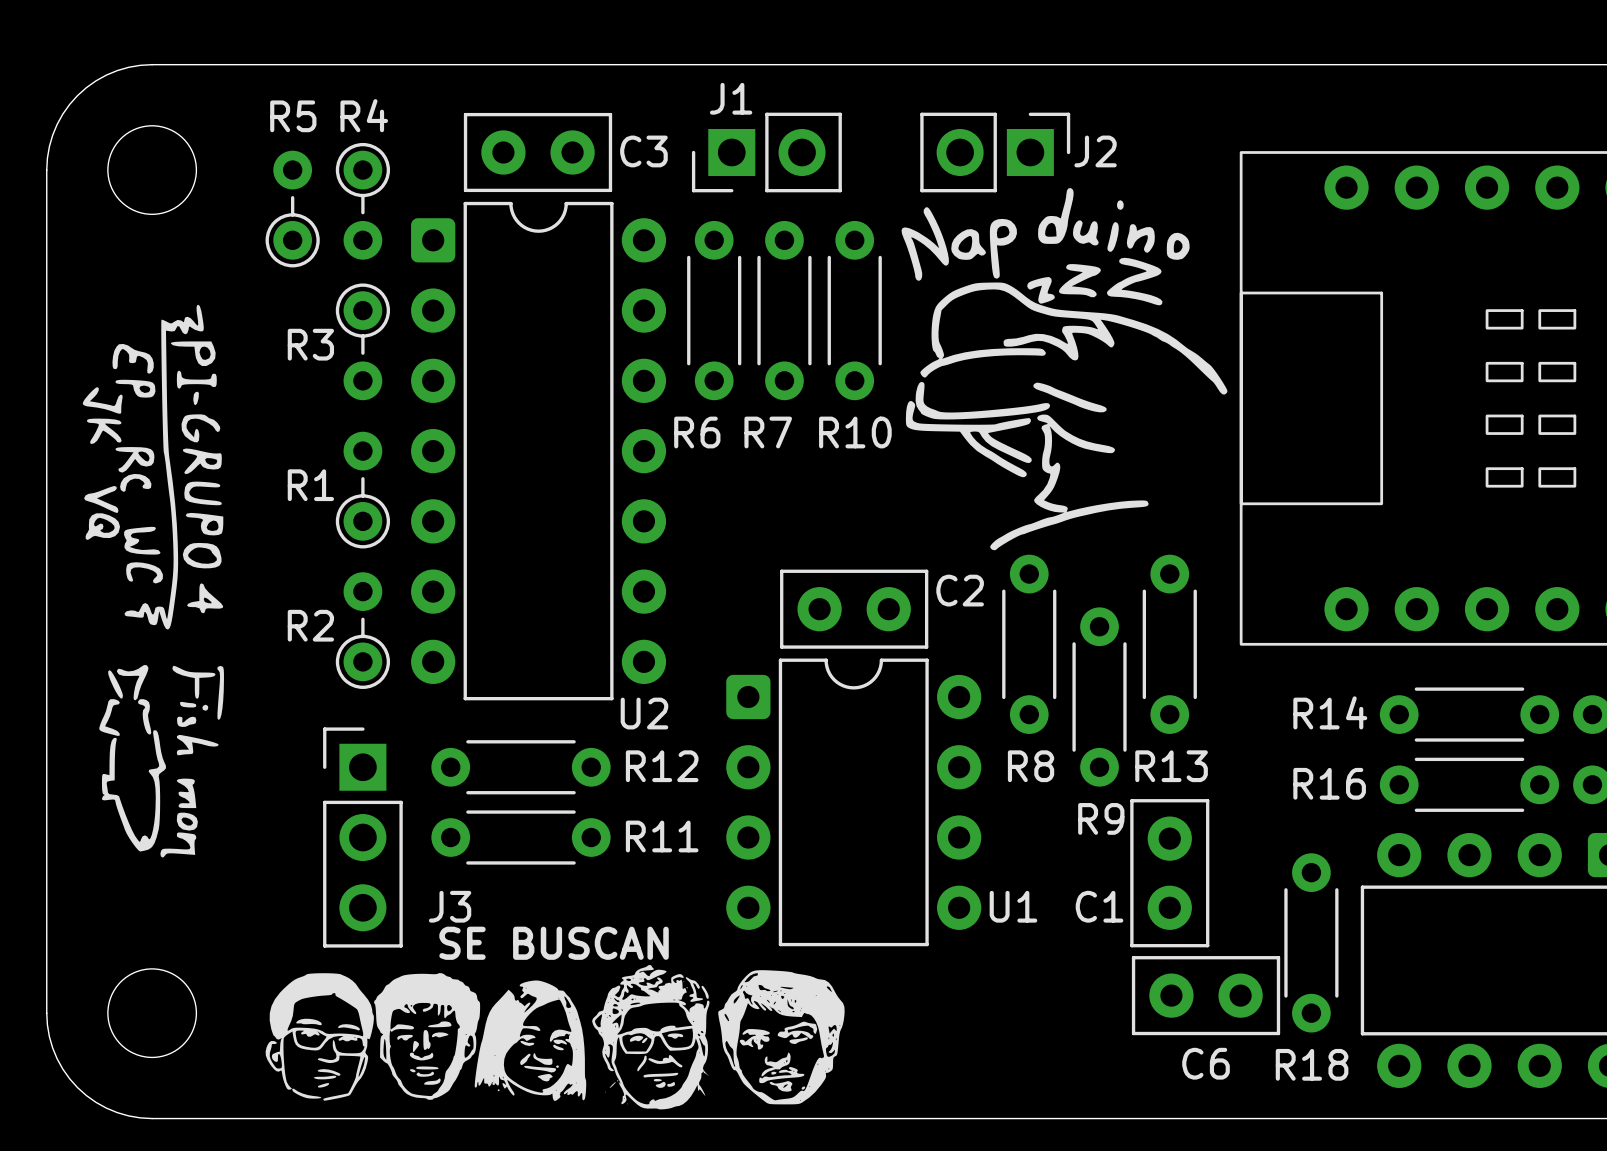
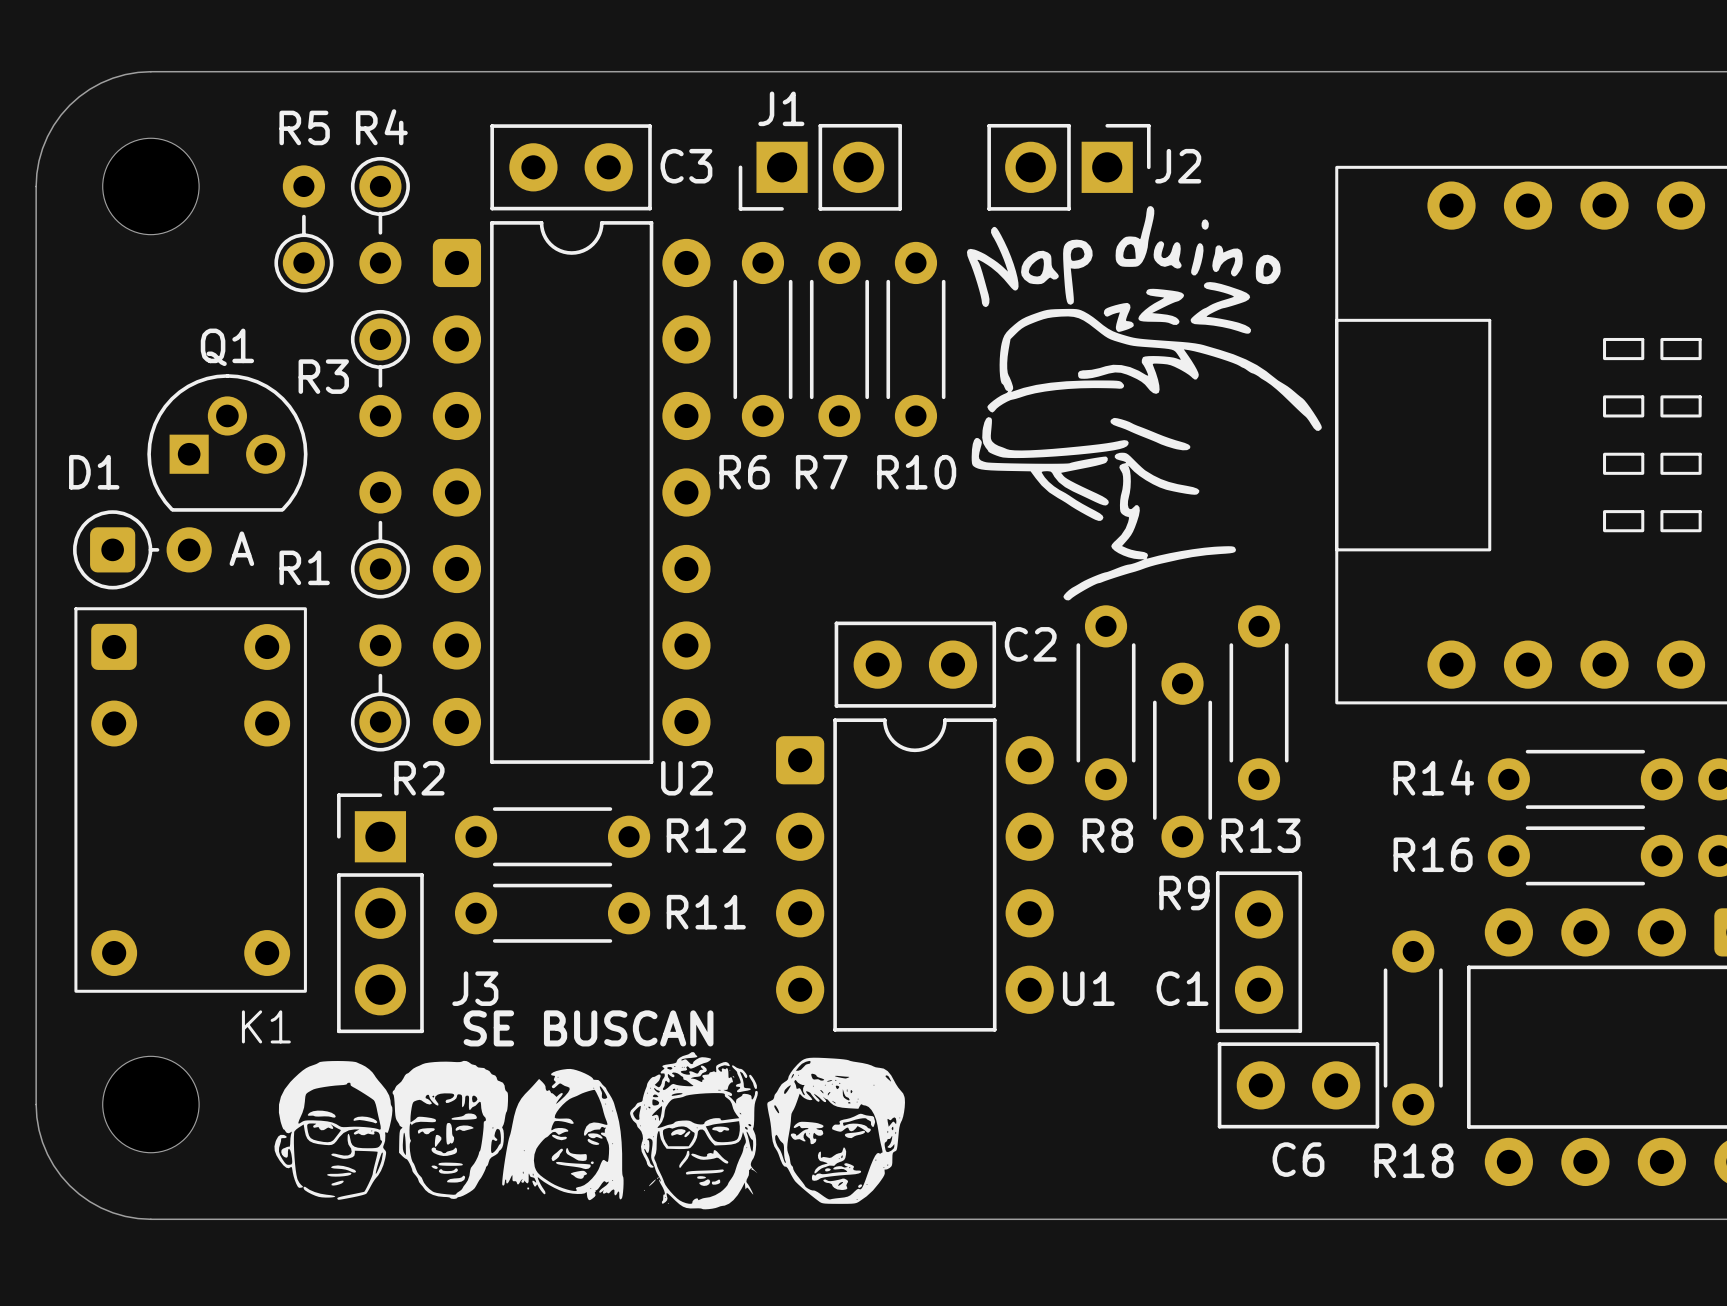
drawing: [82, 304, 224, 858] -> none
Q1: none -> (227, 442)
R1 name position: R1 (310, 485) -> R1 (304, 567)
D1: none -> (142, 549)
R2 name position: R2 (310, 625) -> R2 (419, 778)
K1: none -> (190, 800)

